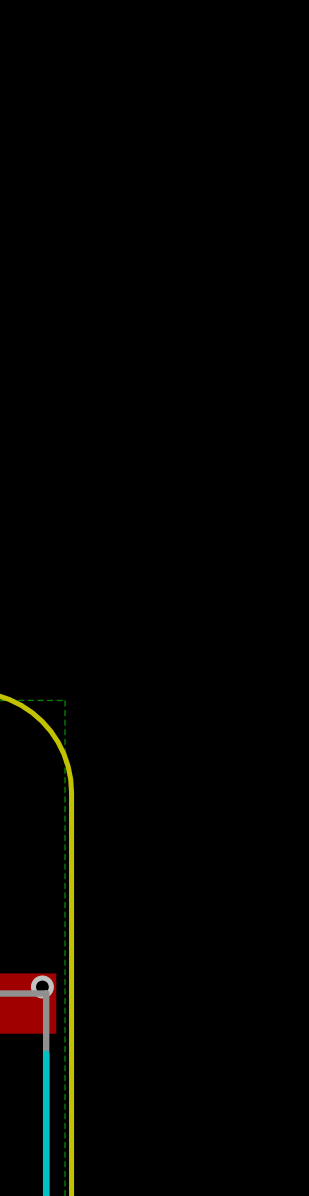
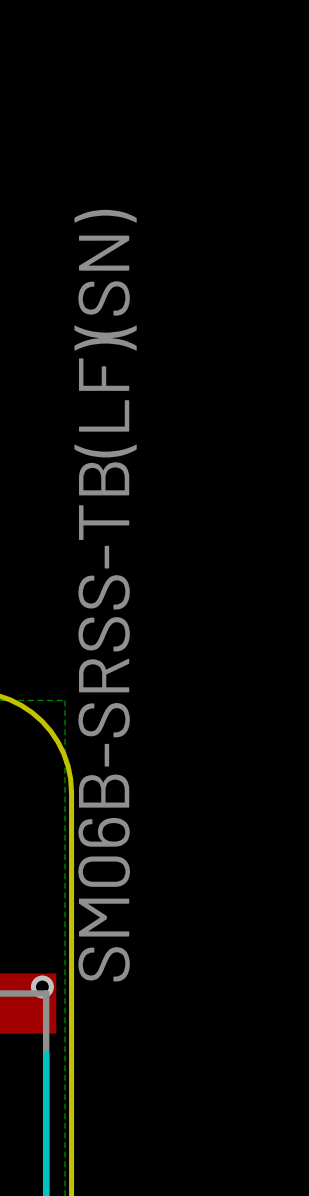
part value: none -> SM06B-SRSS-TB(LF)(SN) (105, 595)

